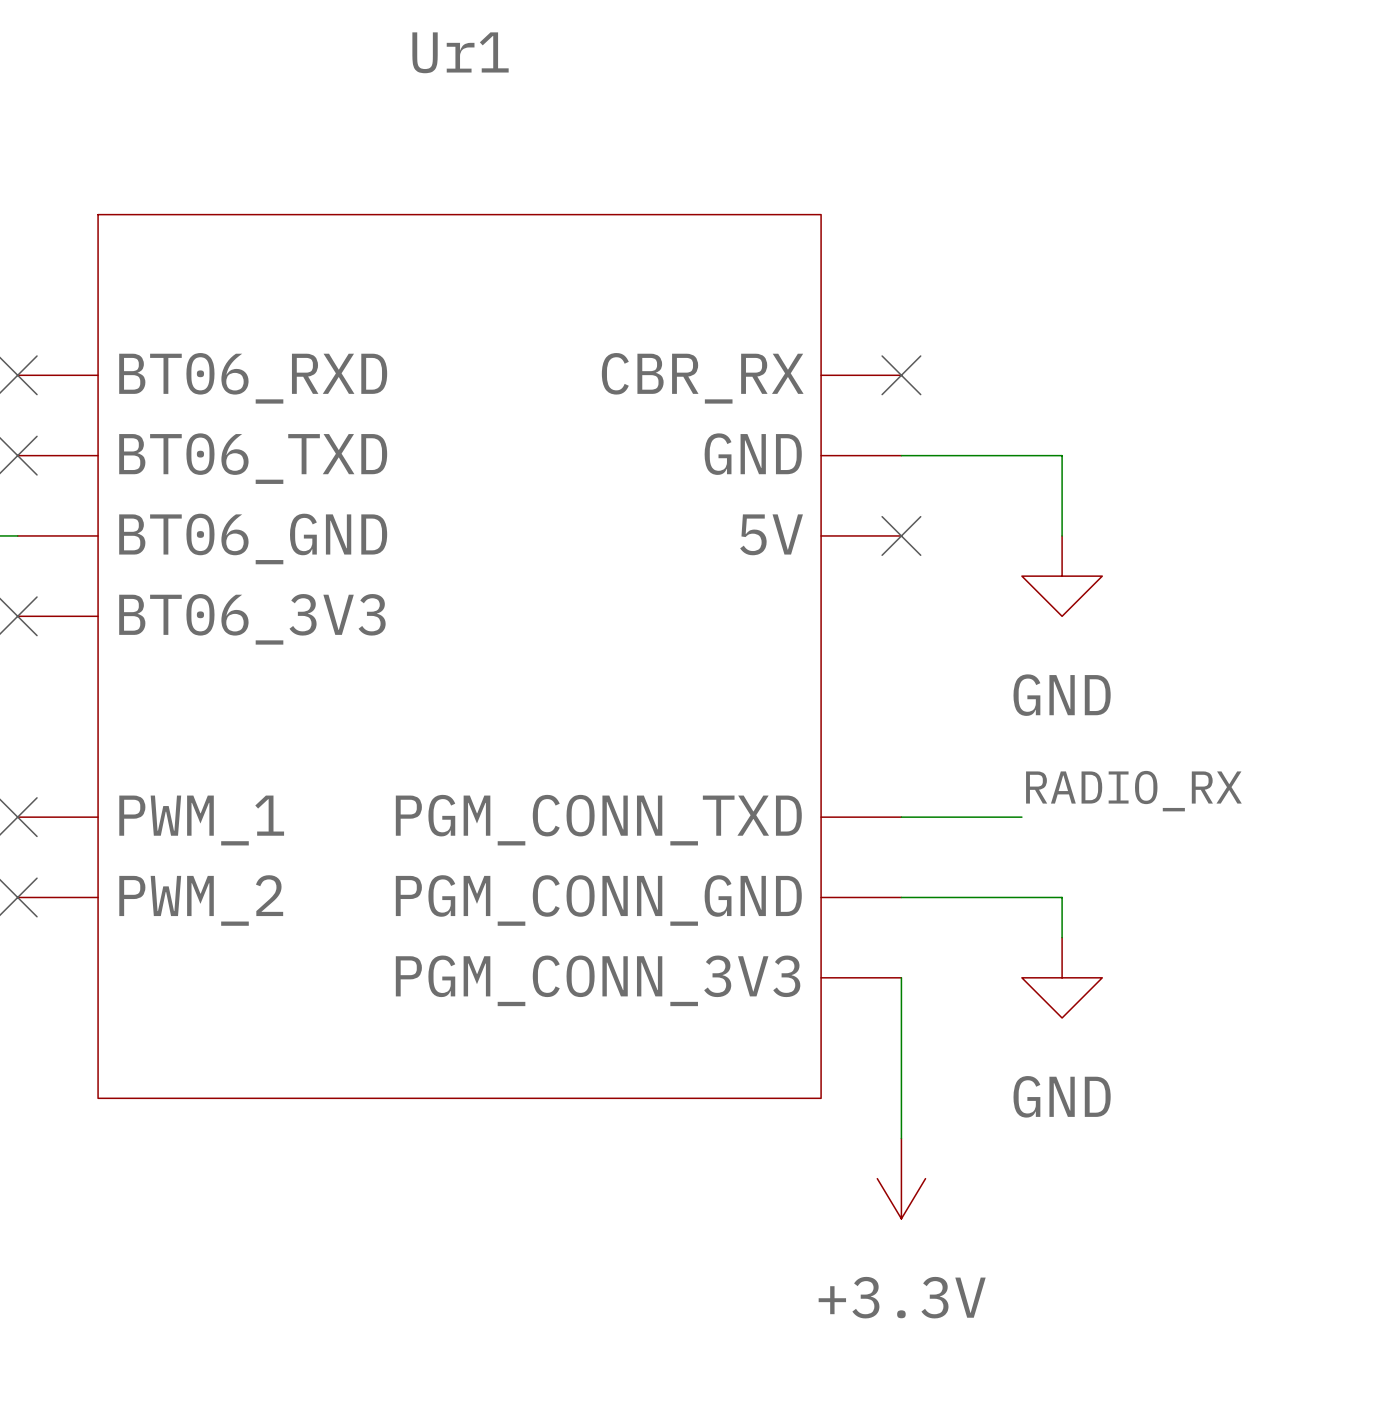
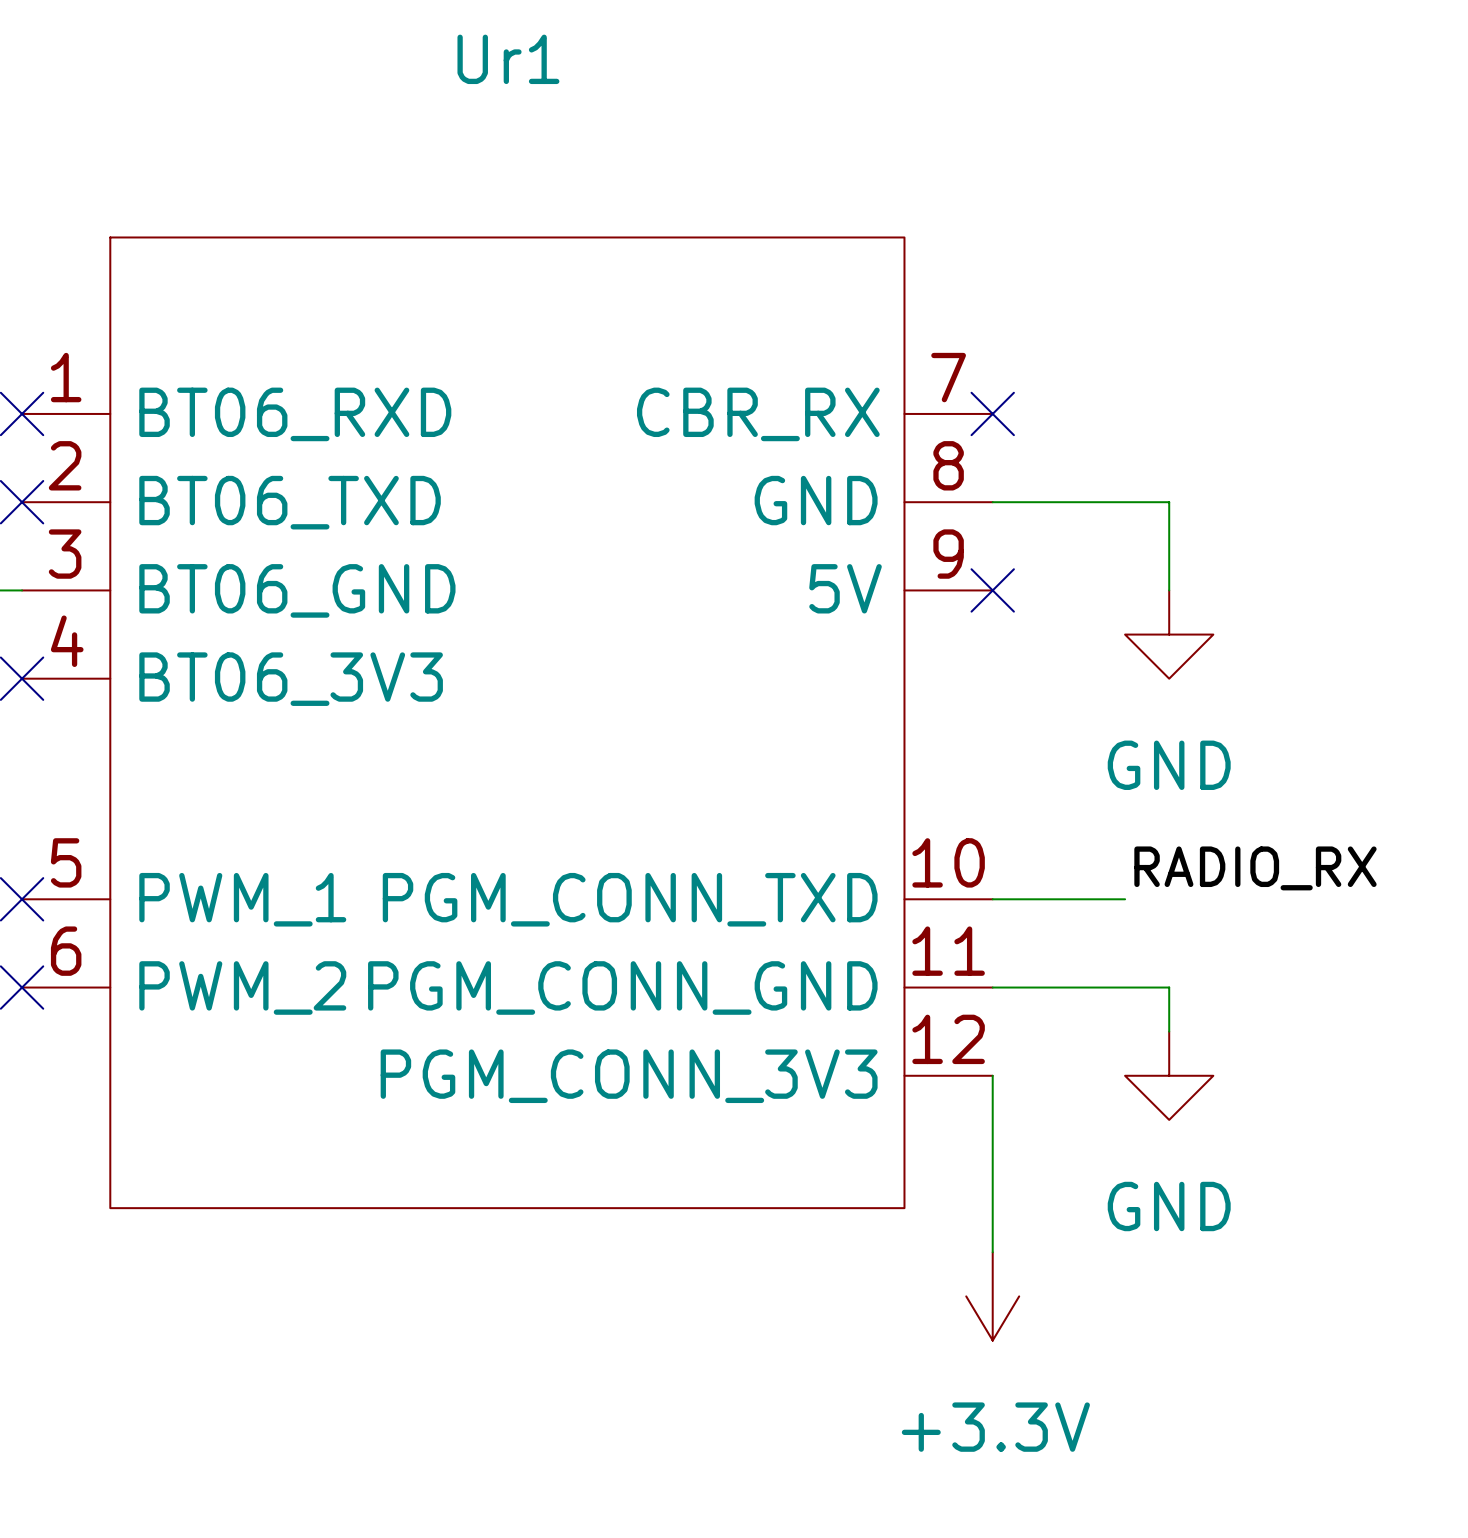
Ur1 symbol: [17, 214, 902, 1099] -> [22, 237, 993, 1209]

